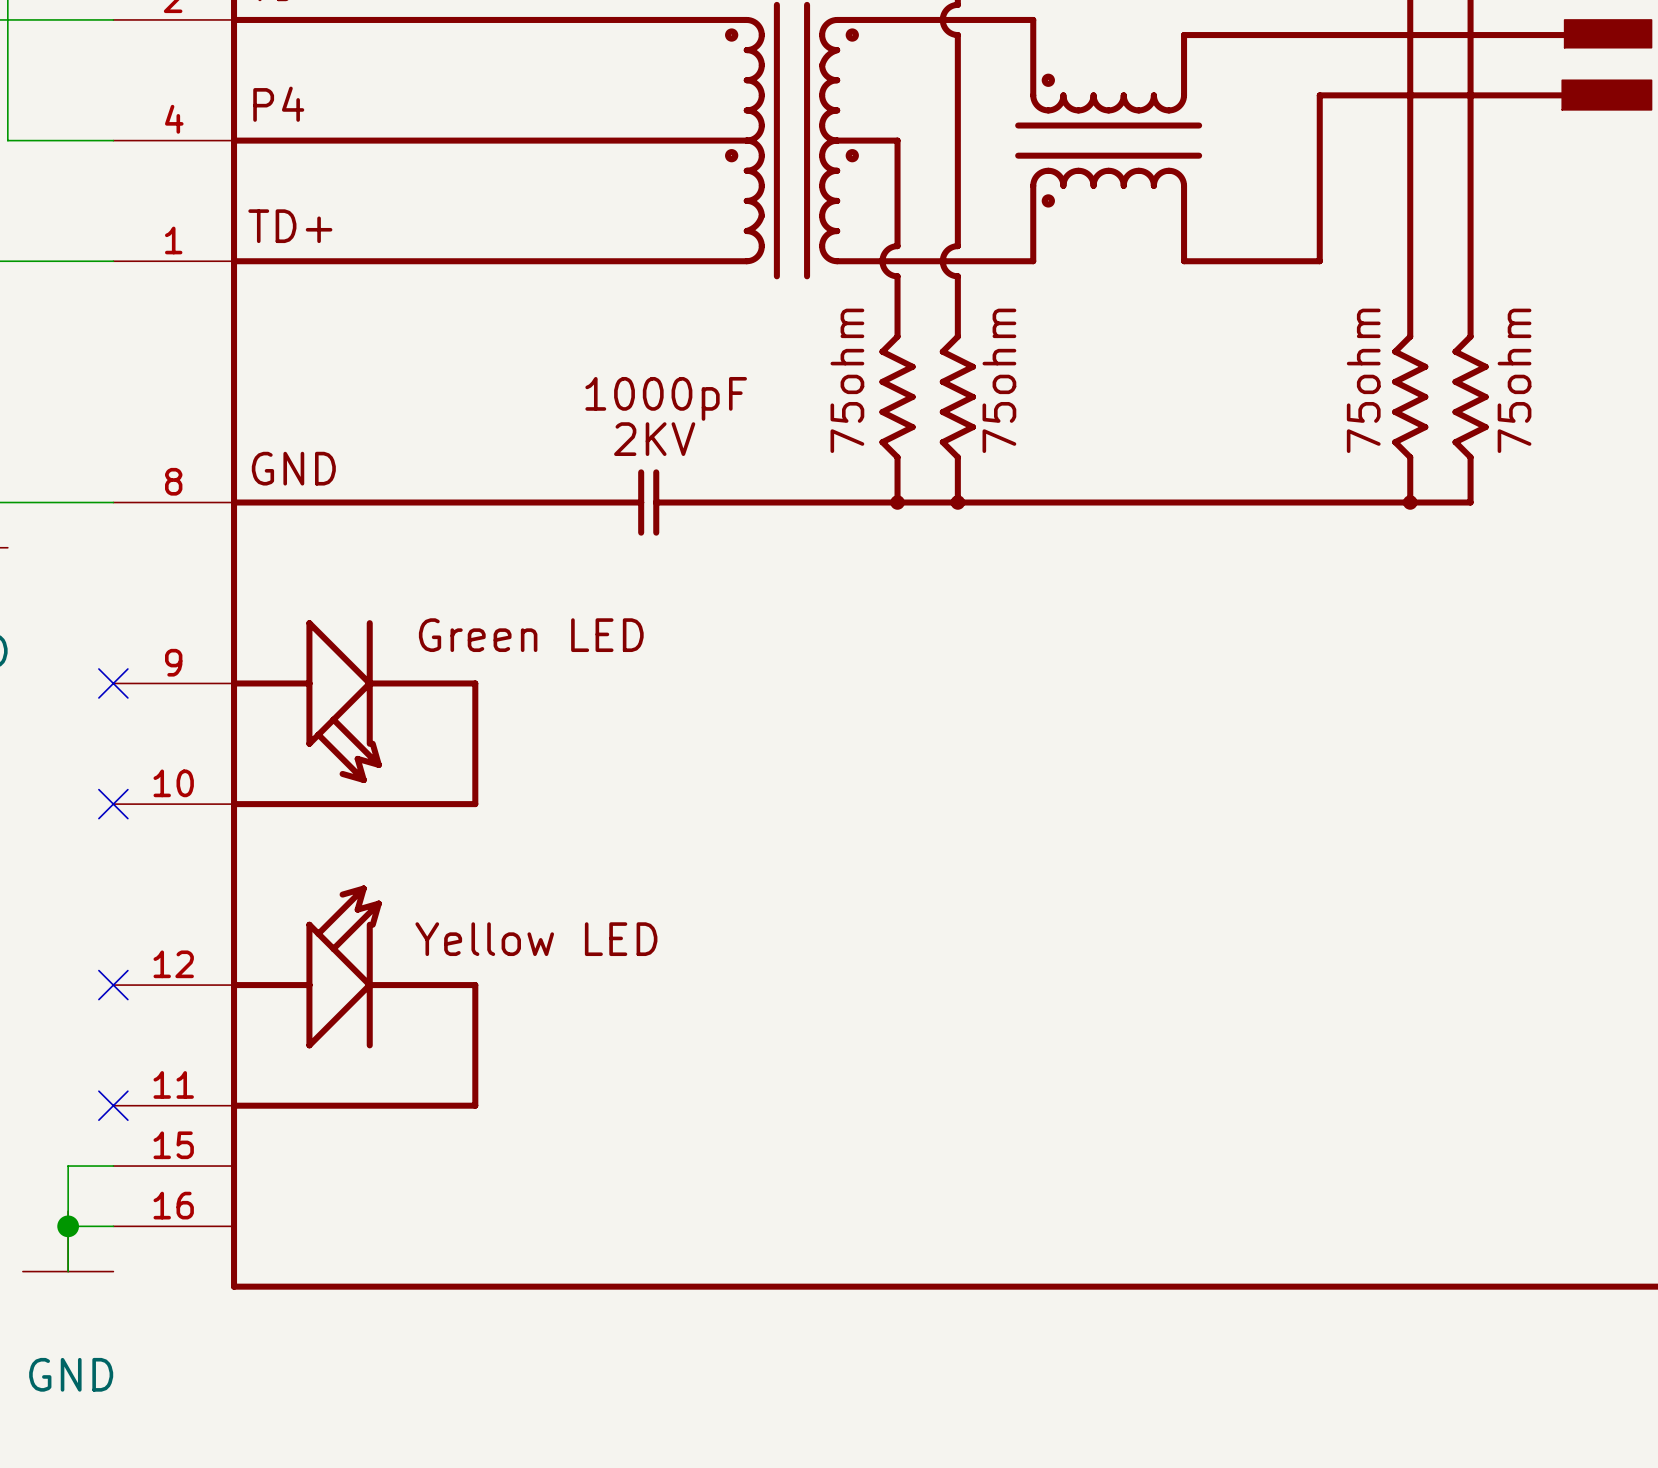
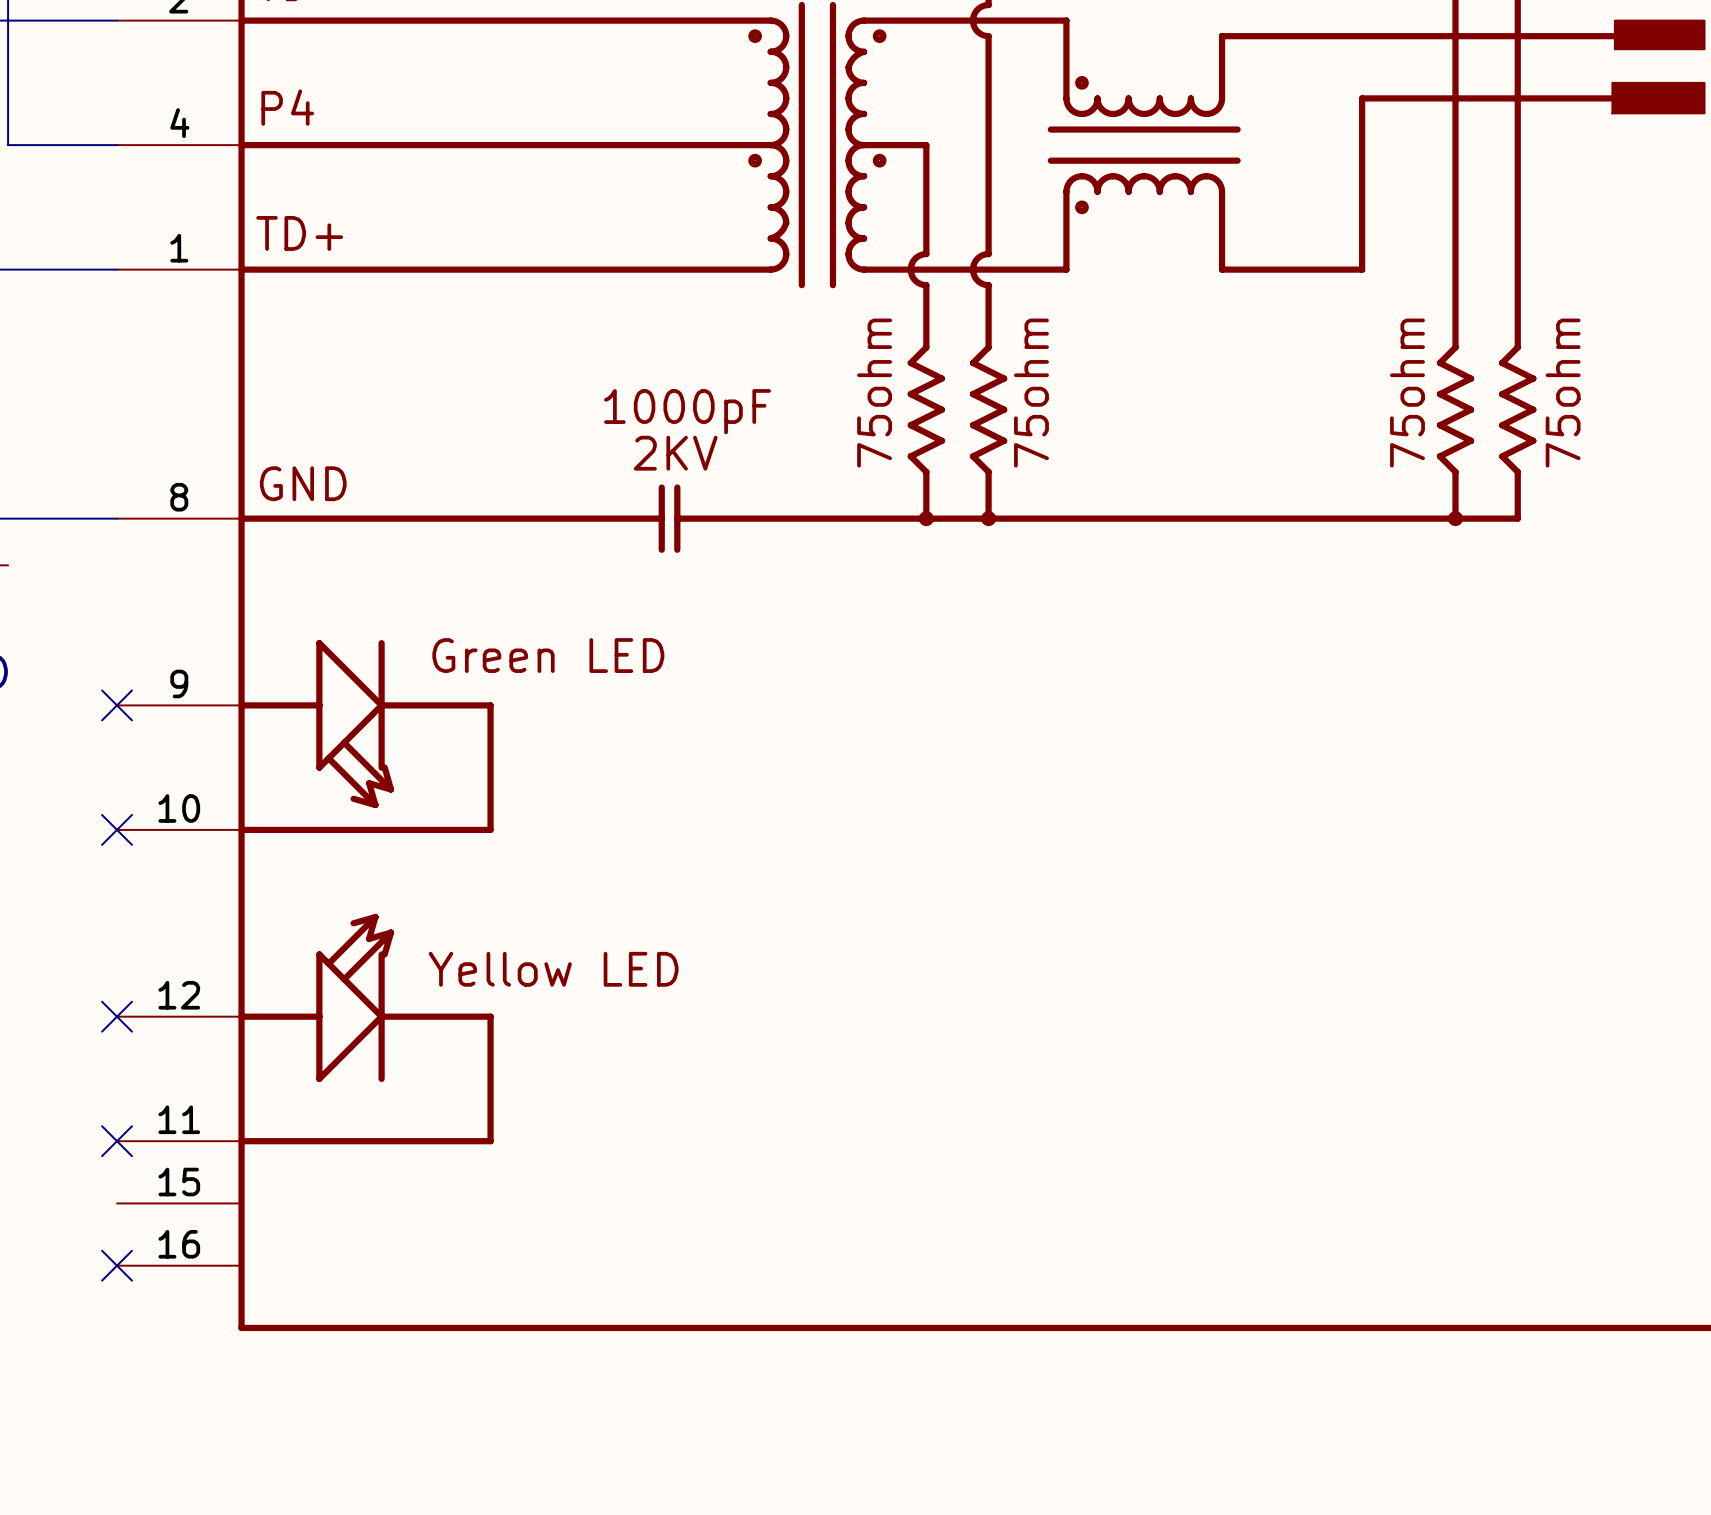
wire: (113, 1166) (68, 1166) (68, 1271) -> none
wire: (68, 1226) (113, 1226) -> none
junction: (68, 1226) -> none
no-connect mark: none -> (117, 1265)
power symbol: GND (68, 1241) -> none

